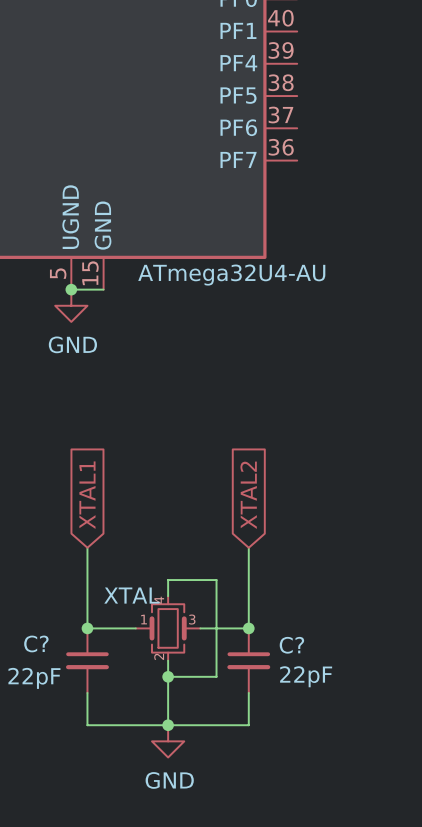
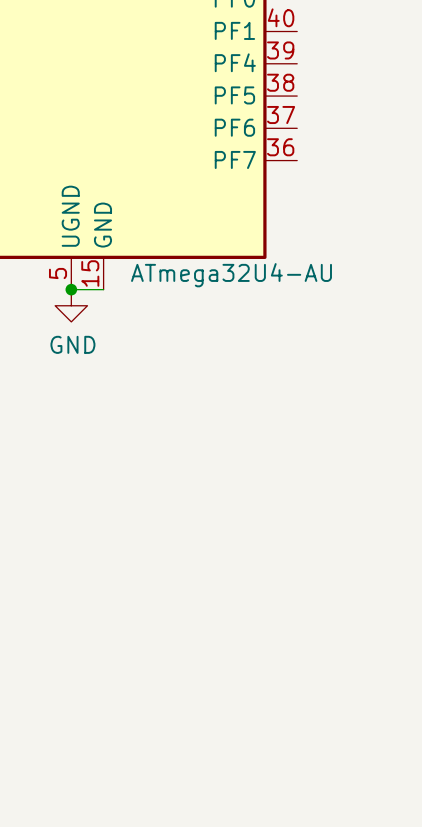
global label: XTAL1 (87, 495) -> none
global label: XTAL2 (248, 495) -> none
wire: (87, 547) (87, 628) (135, 628) -> none
wire: (248, 547) (248, 628) (200, 628) -> none
wire: (168, 596) (168, 580) (216, 580) (216, 676) (168, 676) -> none
junction: (87, 628) -> none
XTAL: (168, 628) -> none
junction: (248, 628) -> none
C?: 22pF (87, 660) -> none
wire: (168, 660) (168, 725) -> none
C?: 22pF (248, 660) -> none
junction: (168, 676) -> none
wire: (87, 692) (87, 725) (248, 725) (248, 692) -> none
junction: (168, 725) -> none
power symbol: GND (168, 741) -> none

